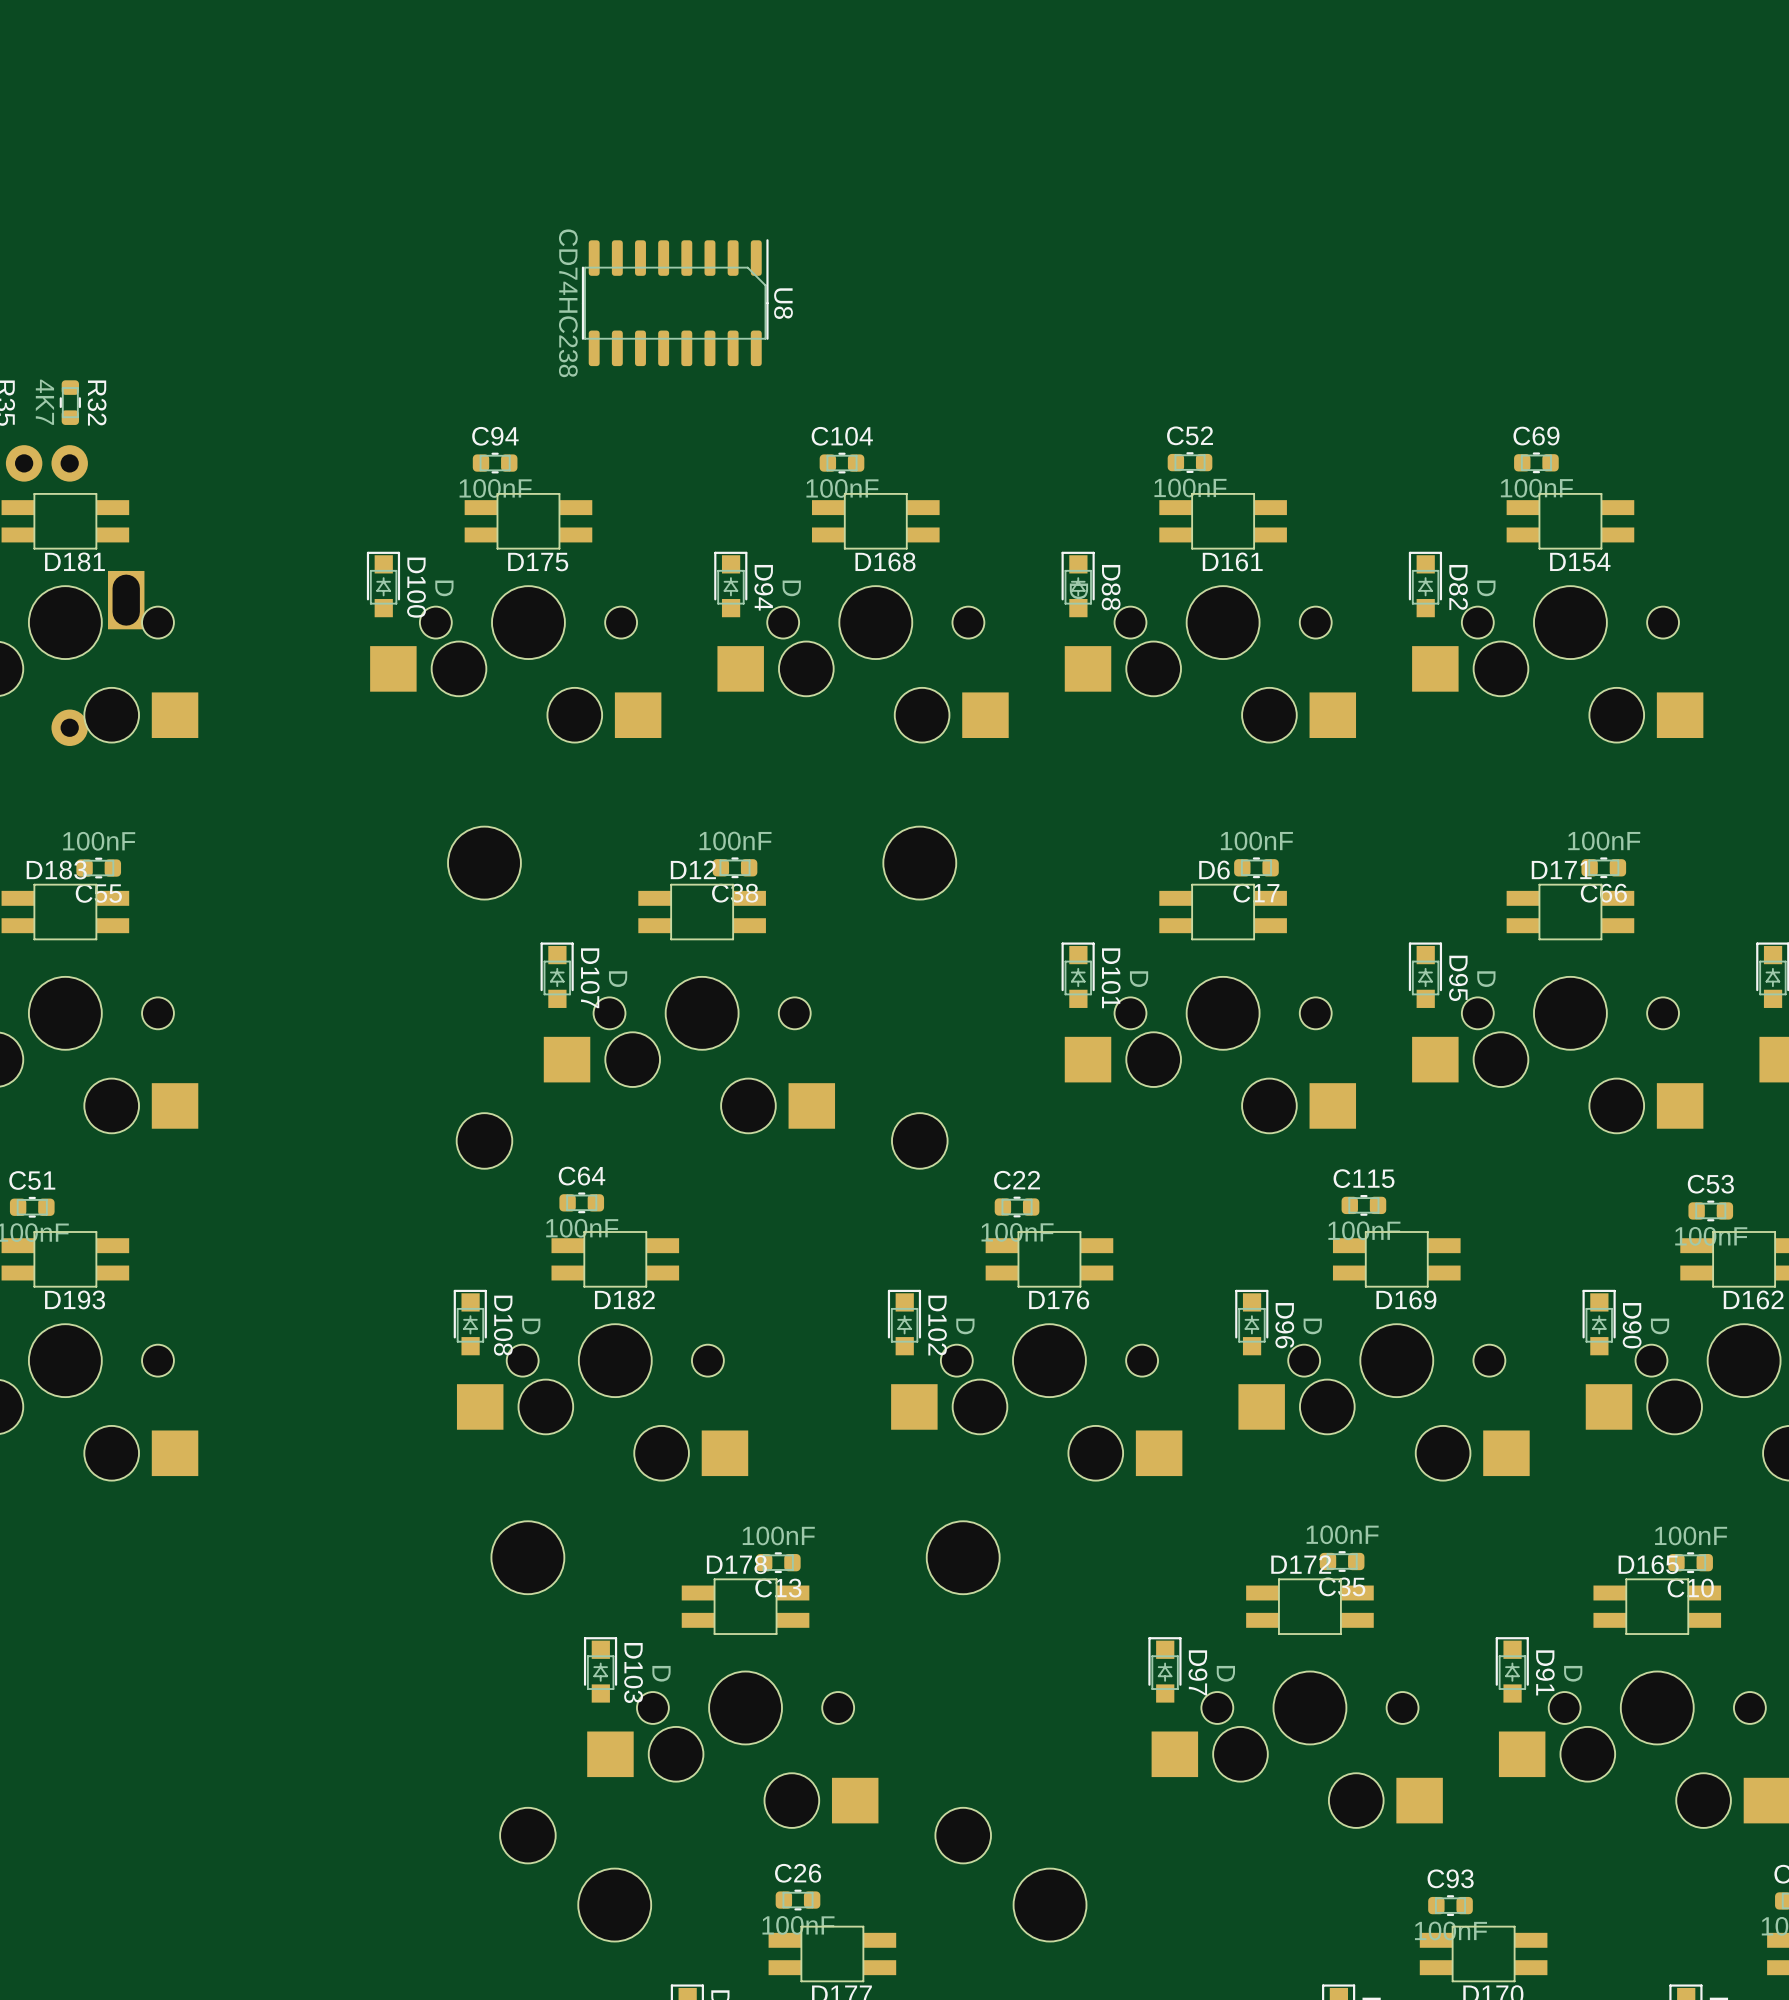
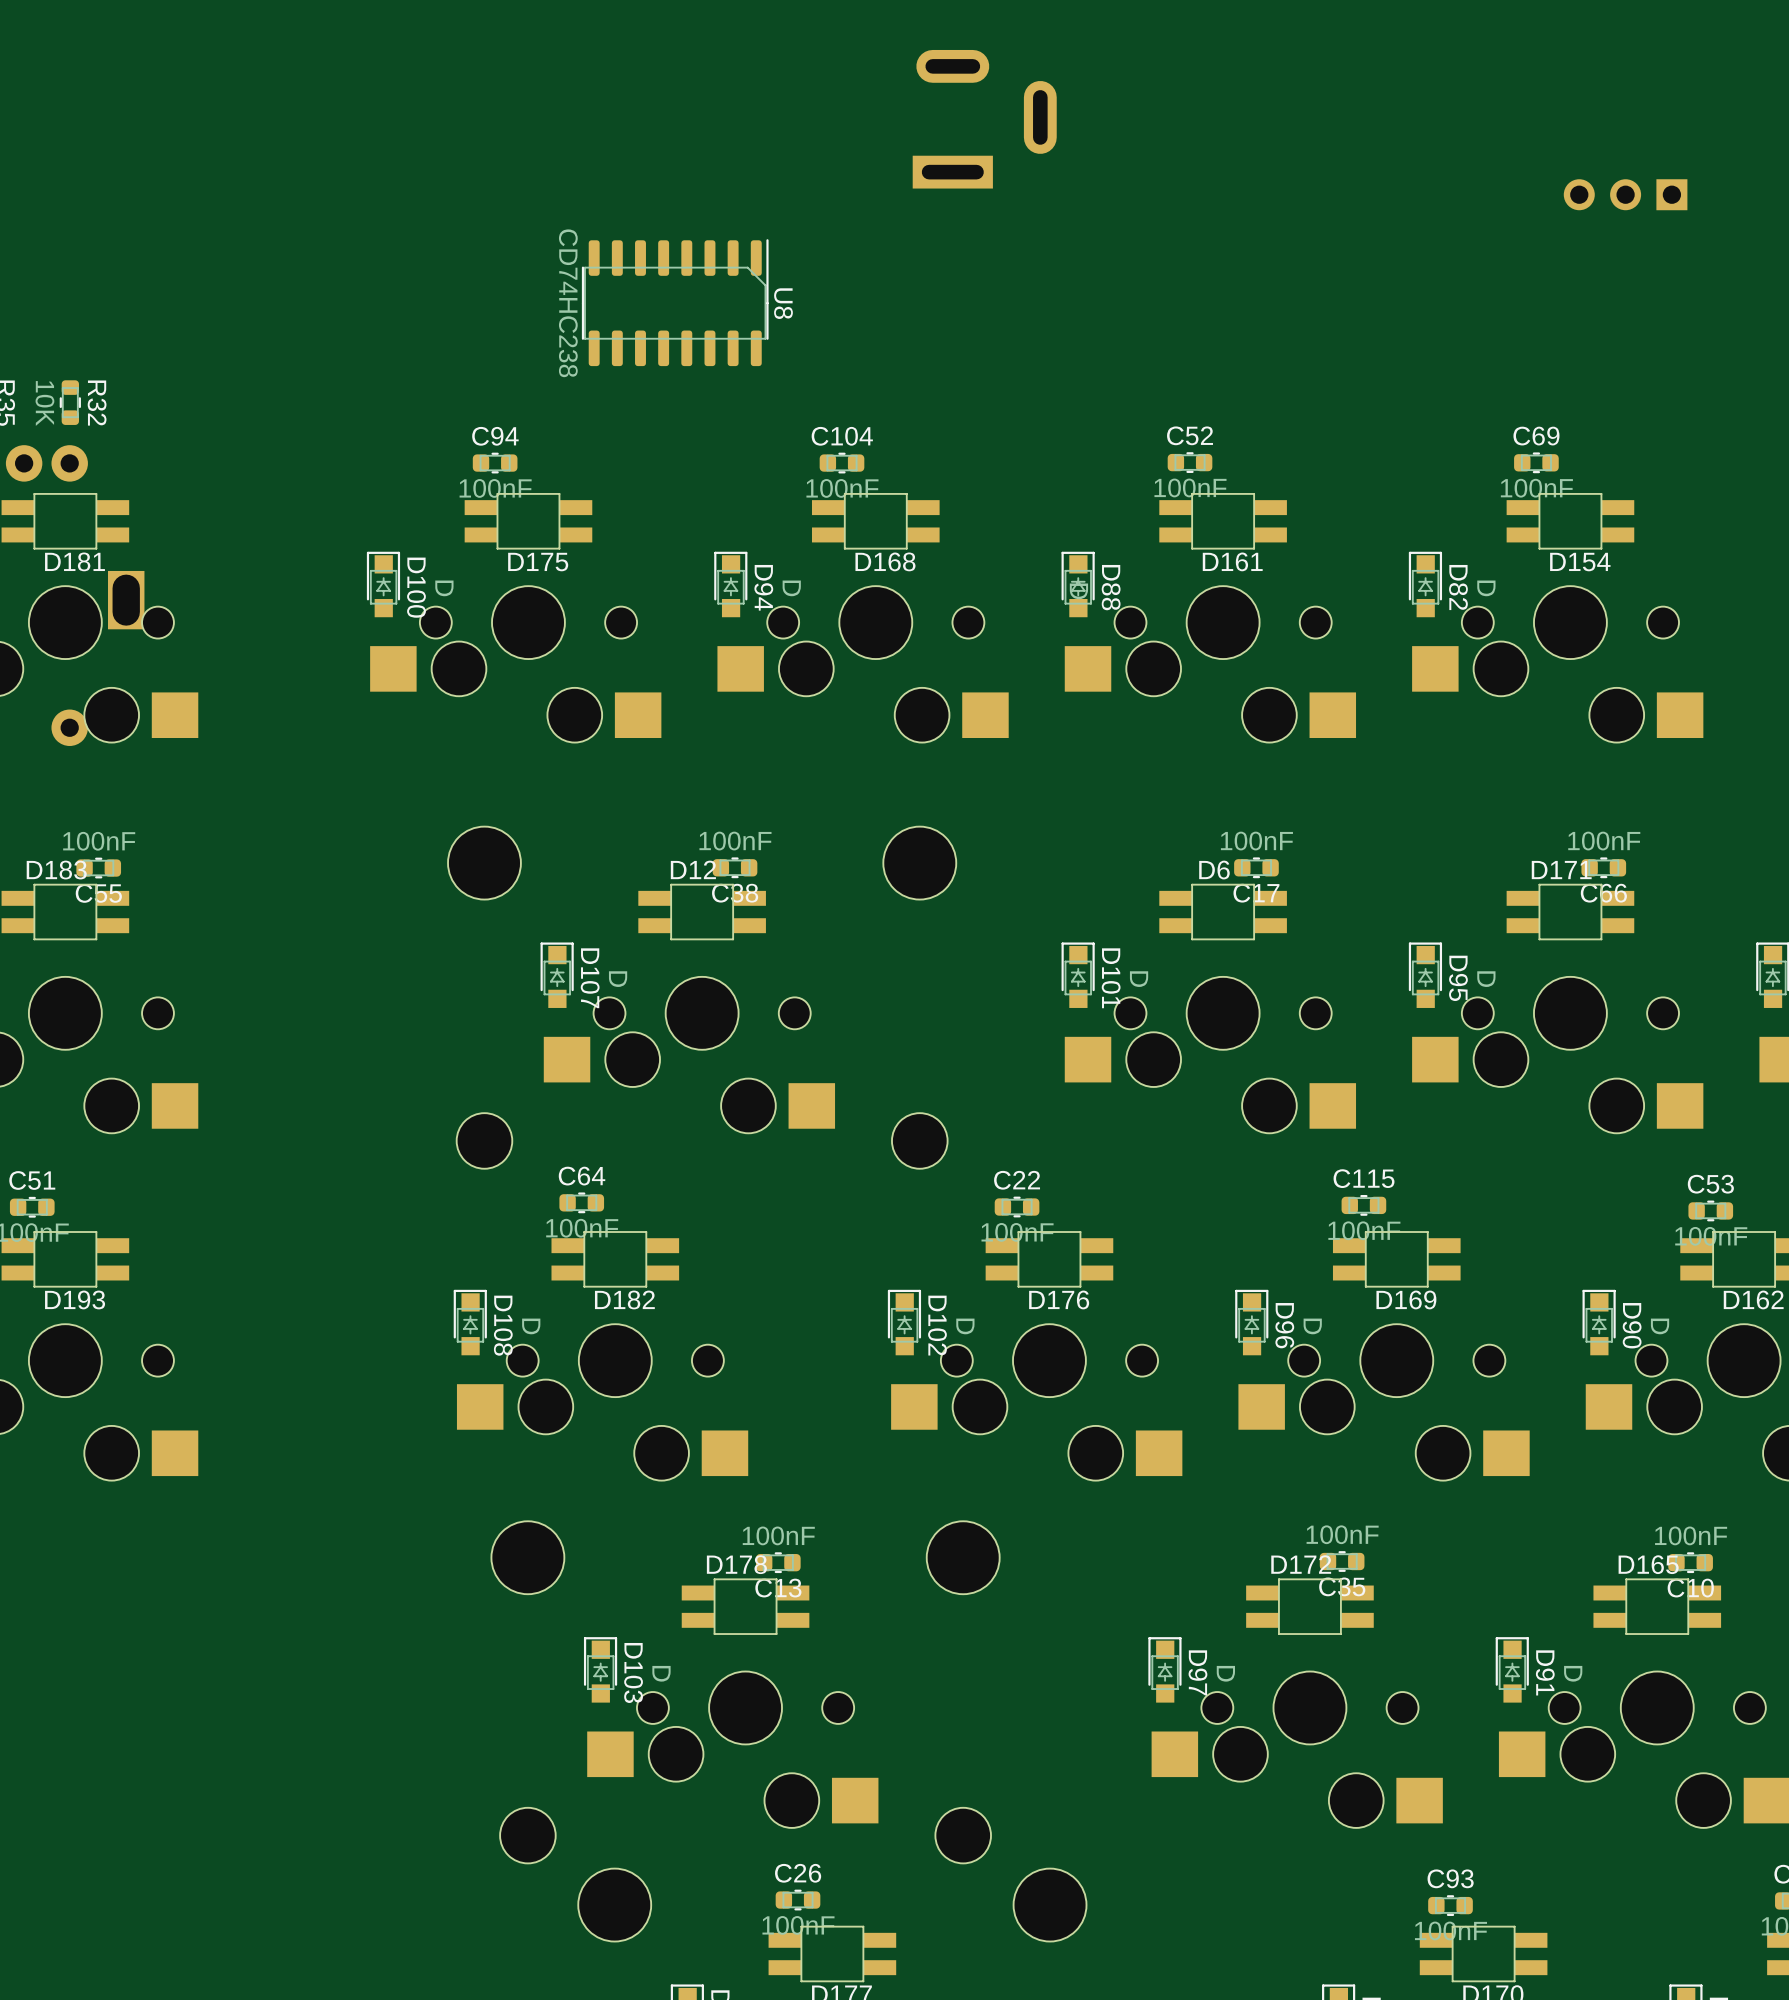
part: none -> (984, 119)
part: none -> (1625, 194)
R32 value: 4K7 (44, 402) -> 10K (44, 403)

